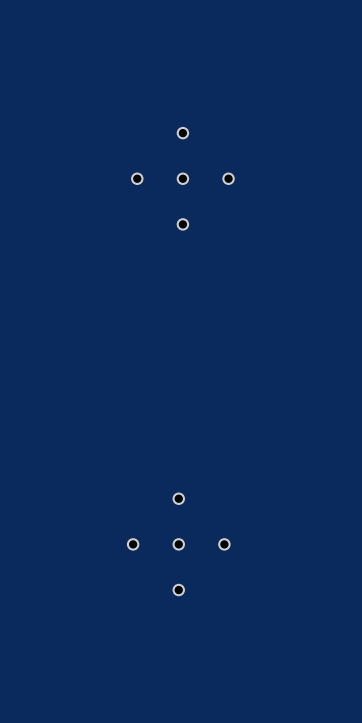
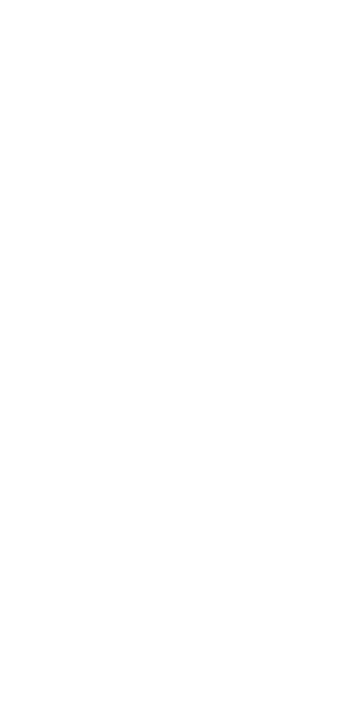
part: (182, 178) -> none
part: (178, 544) -> none

